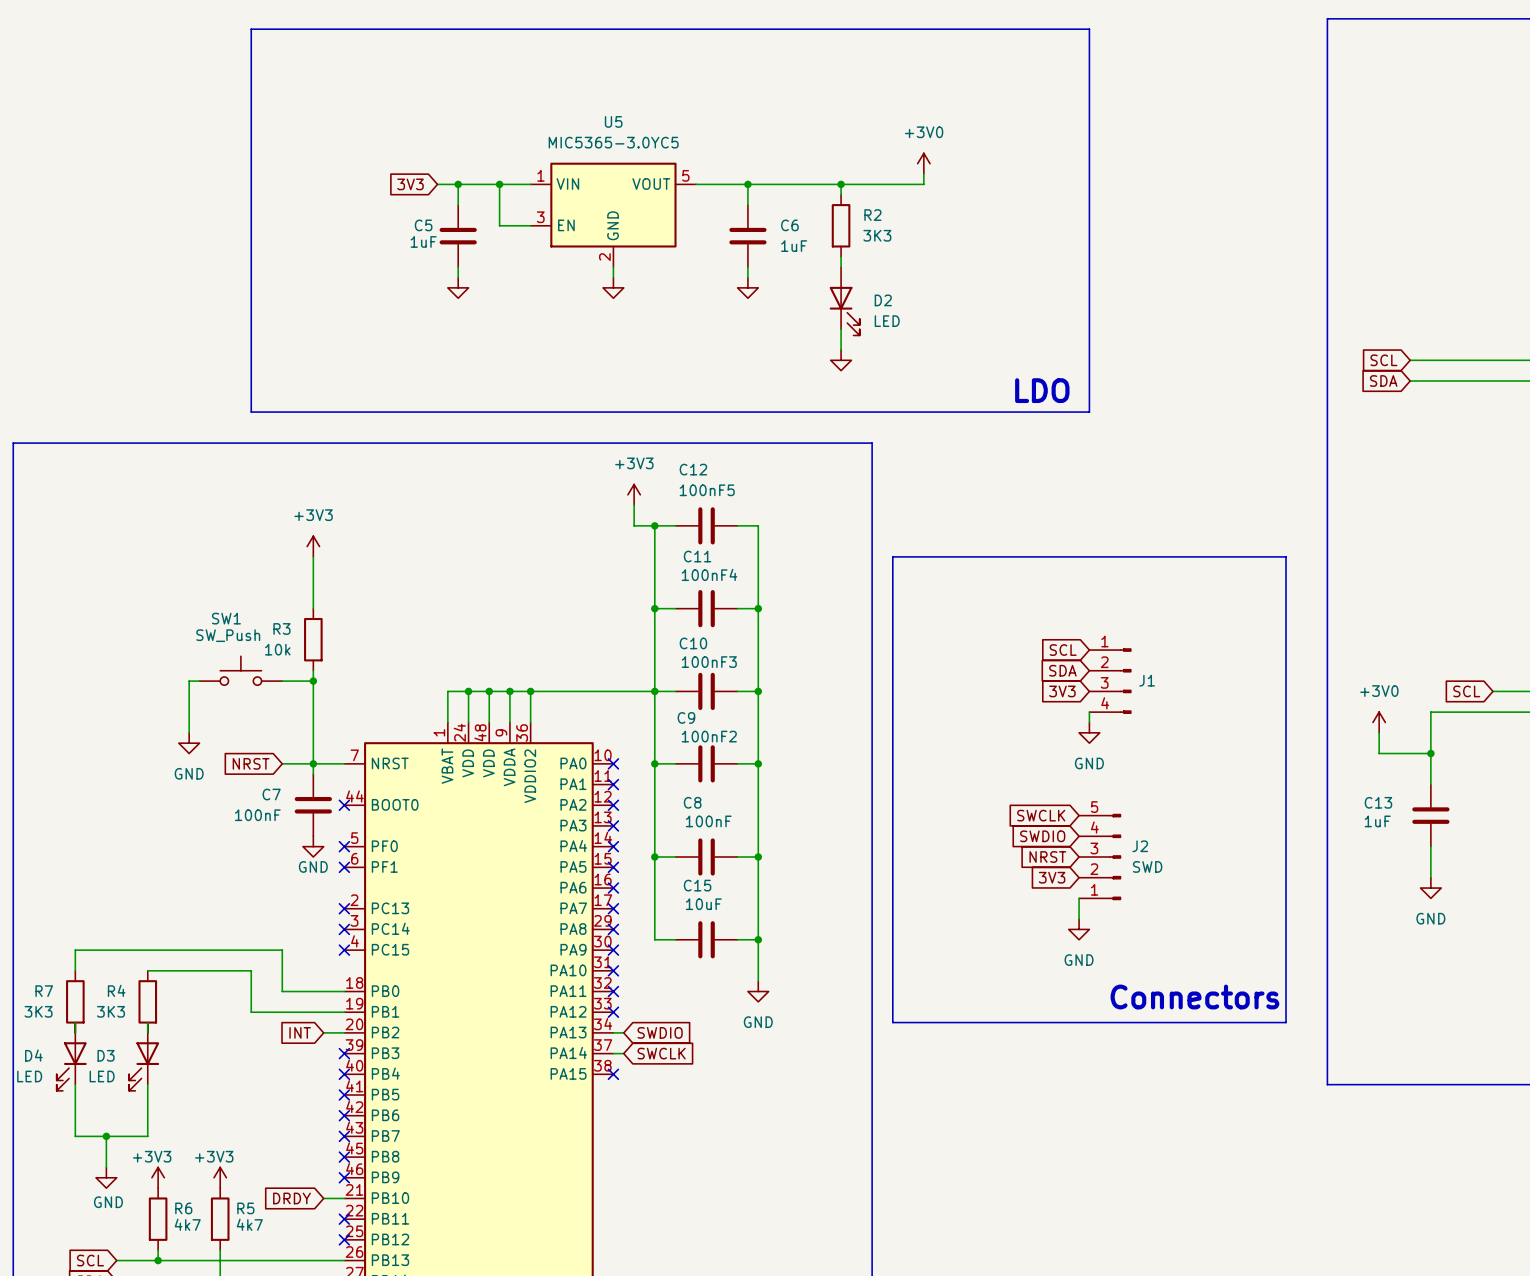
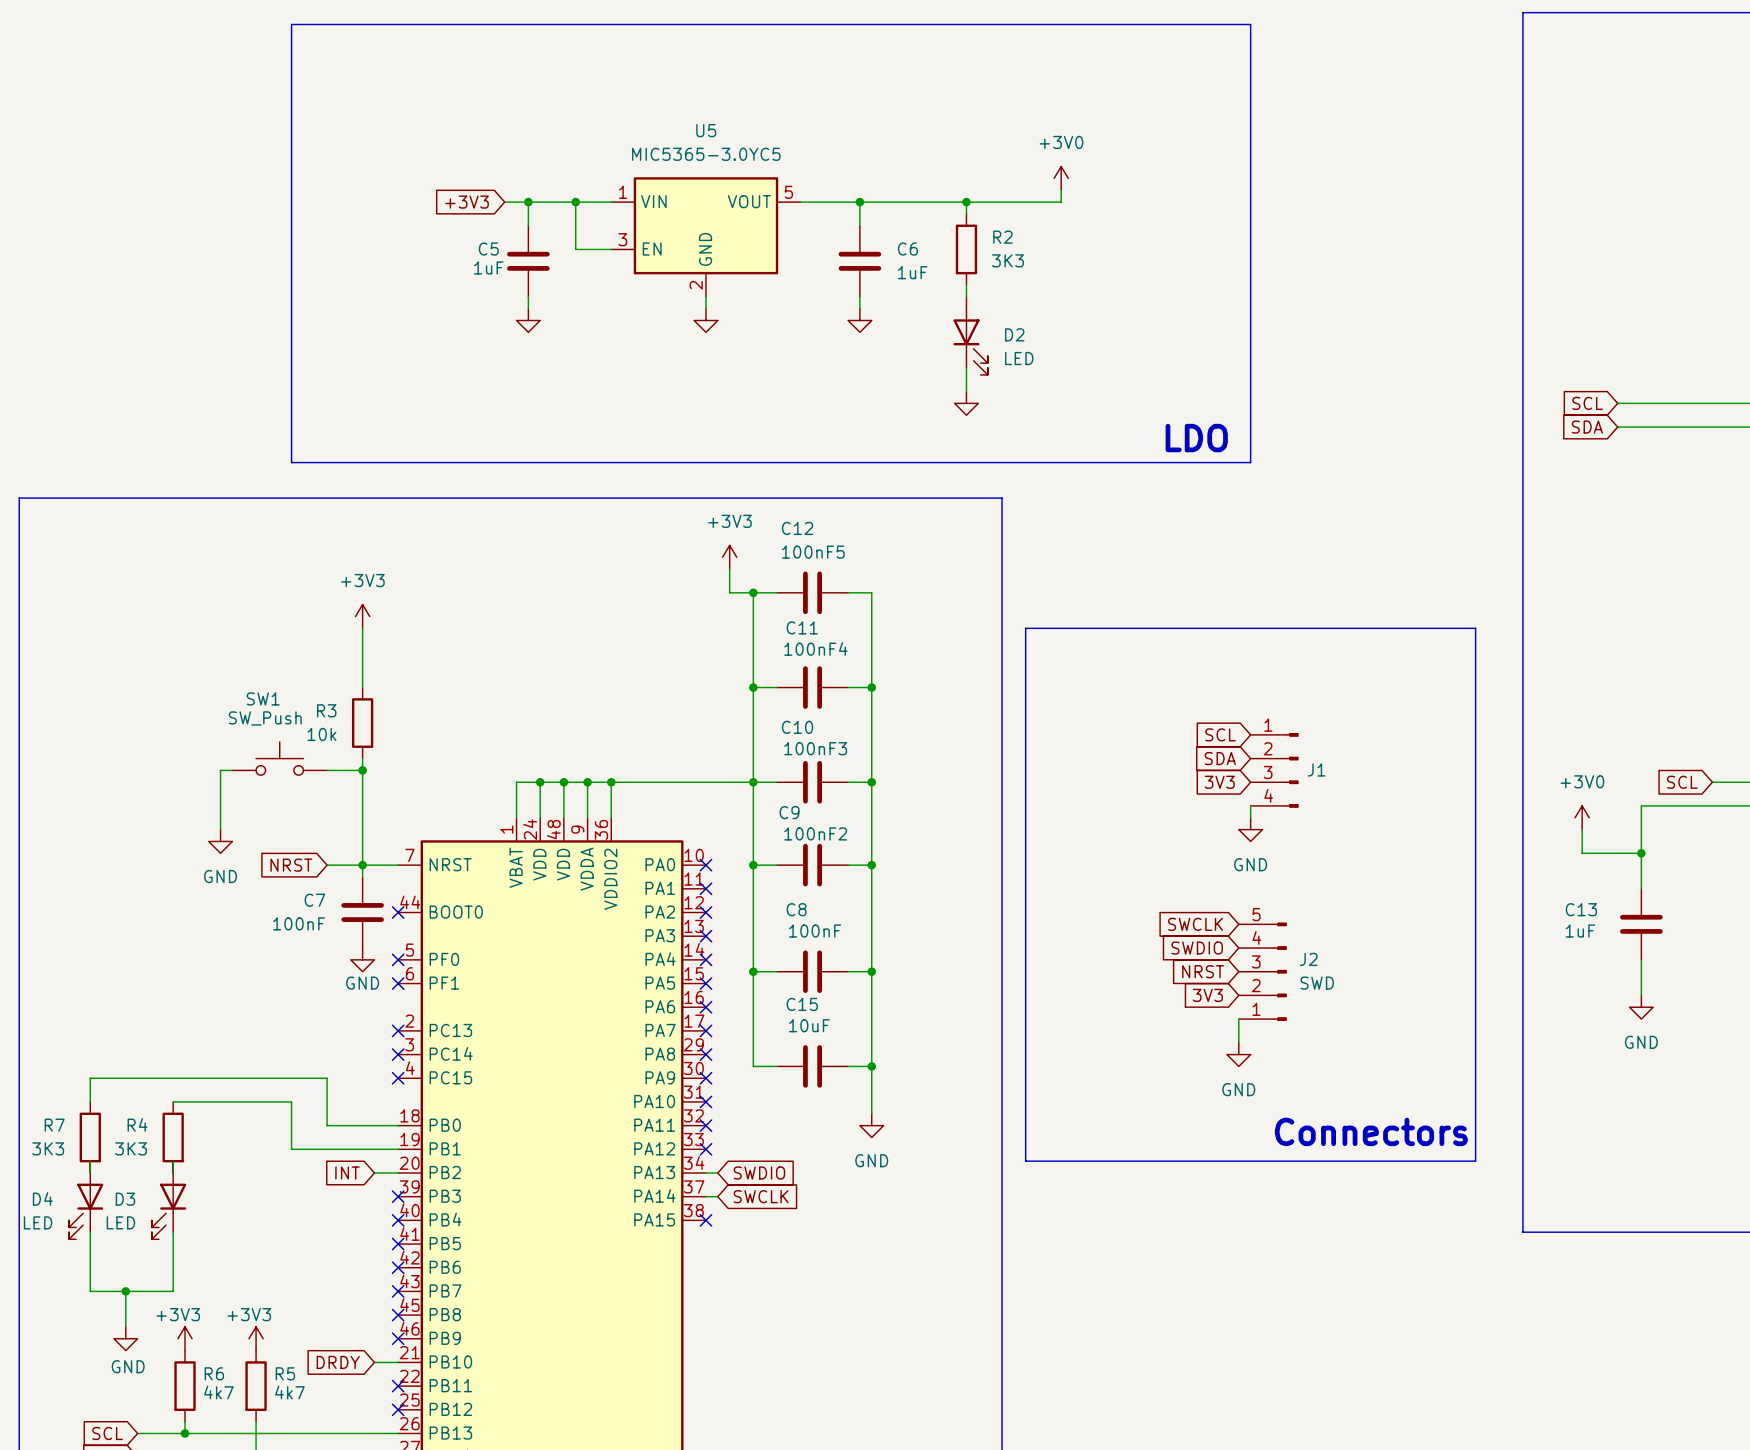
global label: 3V3 (410, 184) -> +3V3 (467, 202)

